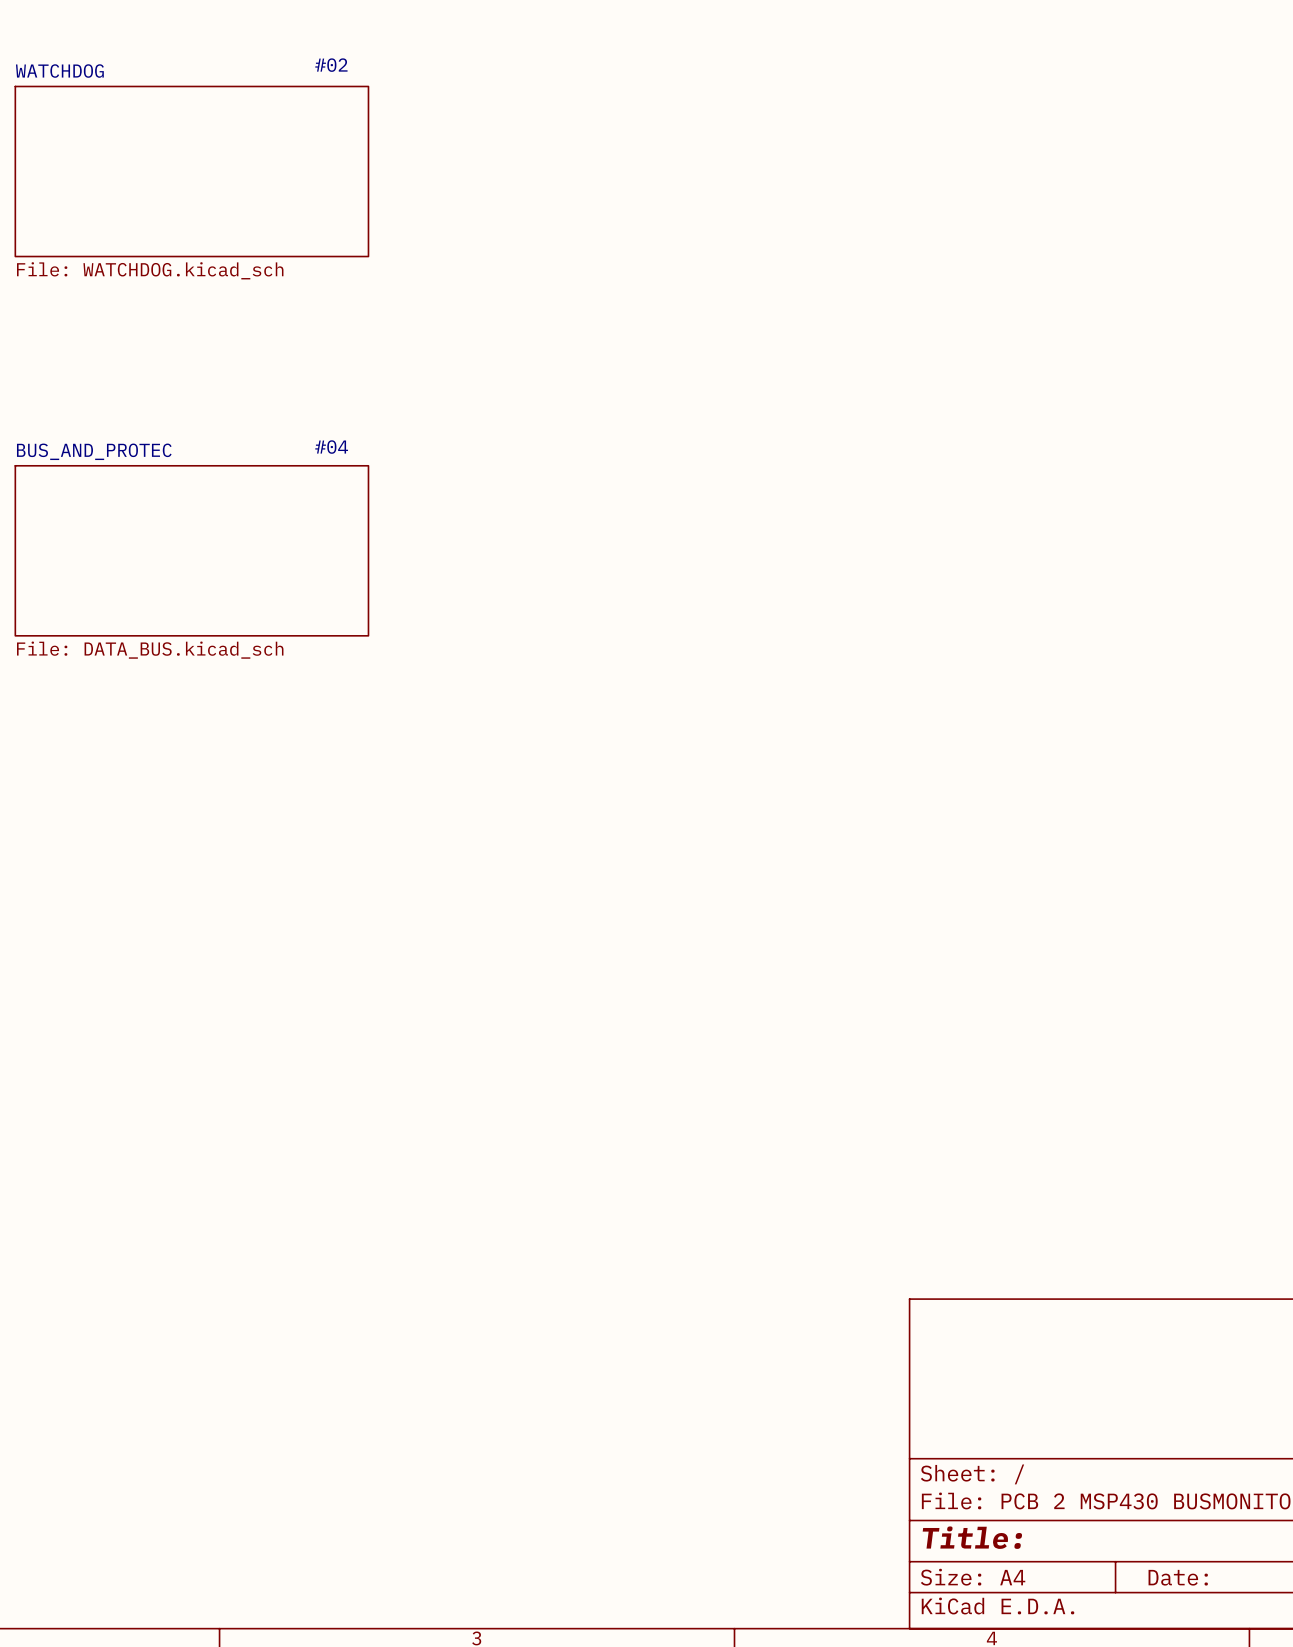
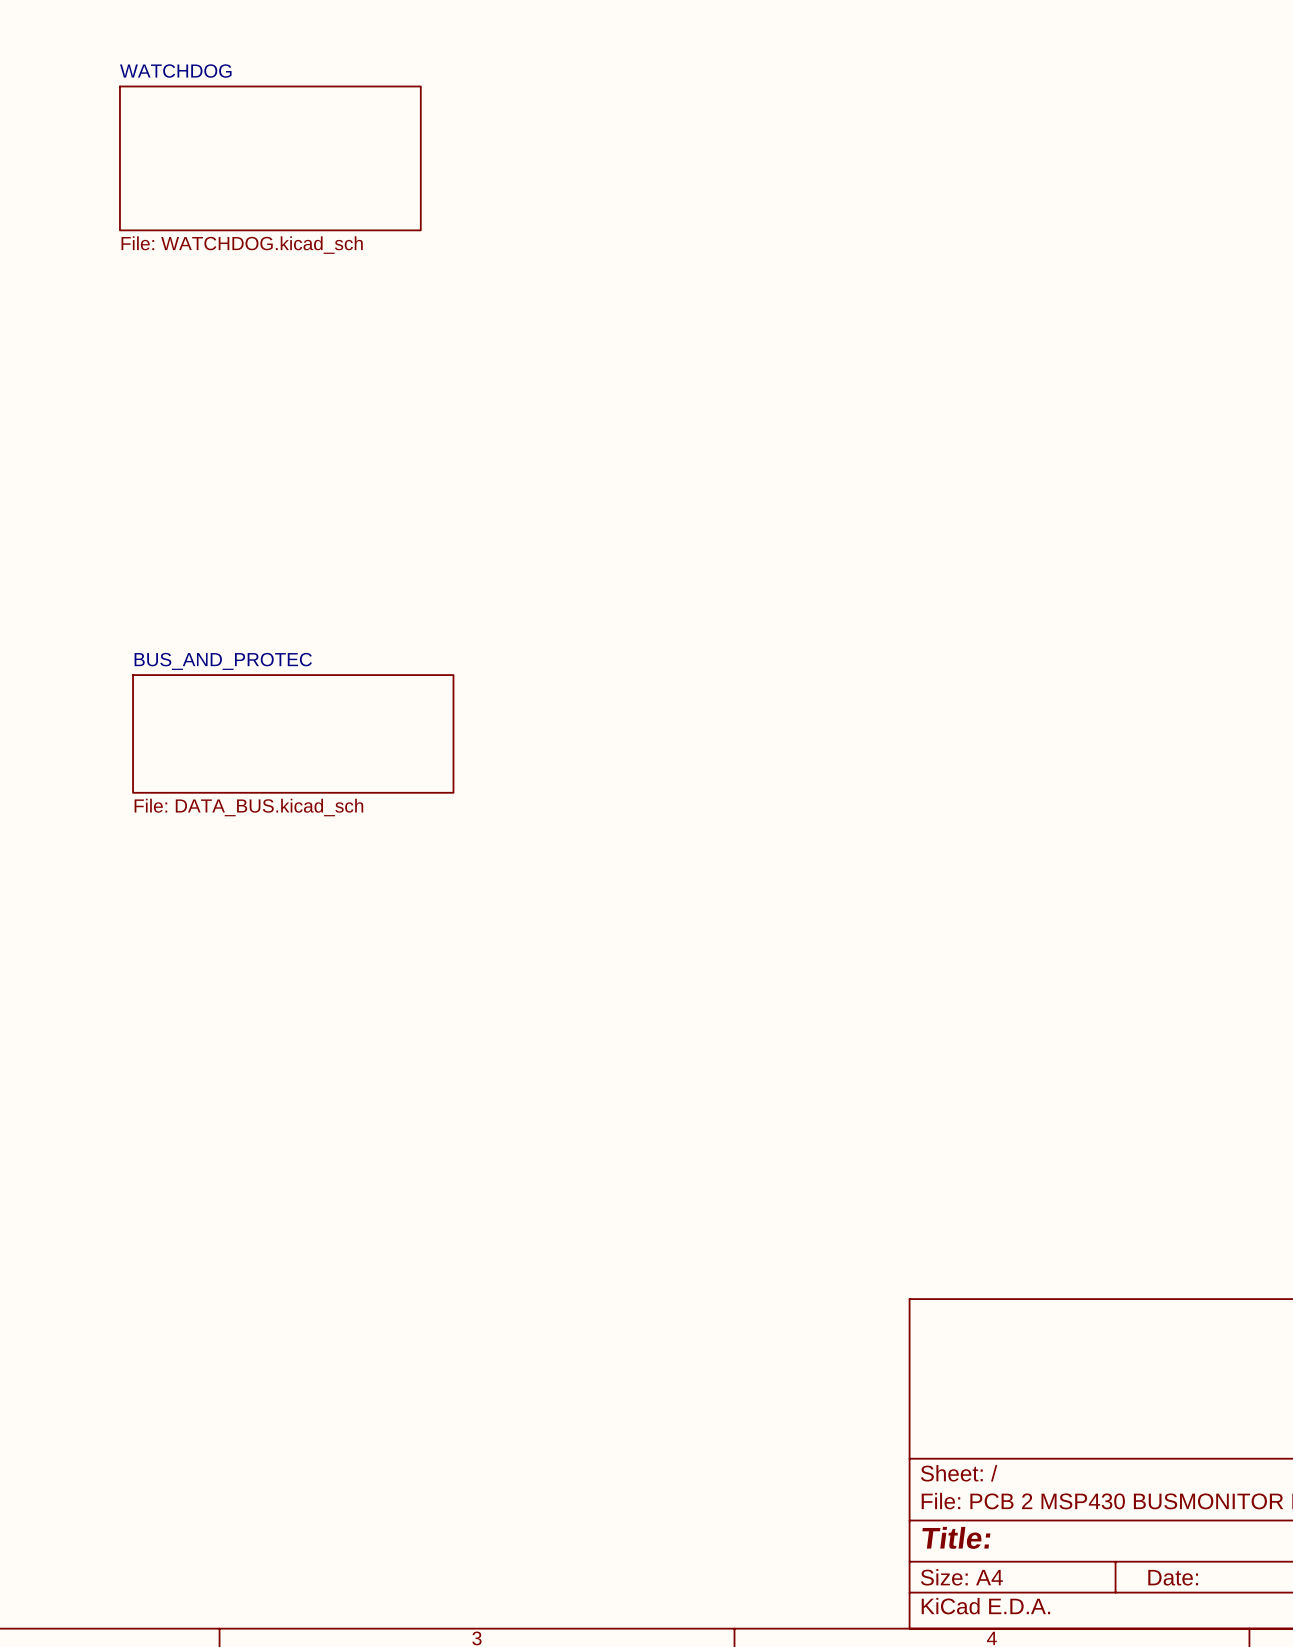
text: #02 (331, 65) -> none
sheet WATCHDOG: none -> File: WATCHDOG.kicad_sch (270, 158)
sheet WATCHDOG: File: WATCHDOG.kicad_sch (191, 171) -> none
text: #04 (331, 447) -> none
sheet BUS_AND_PROTEC: File: DATA_BUS.kicad_sch (191, 550) -> none
sheet BUS_AND_PROTEC: none -> File: DATA_BUS.kicad_sch (293, 733)

